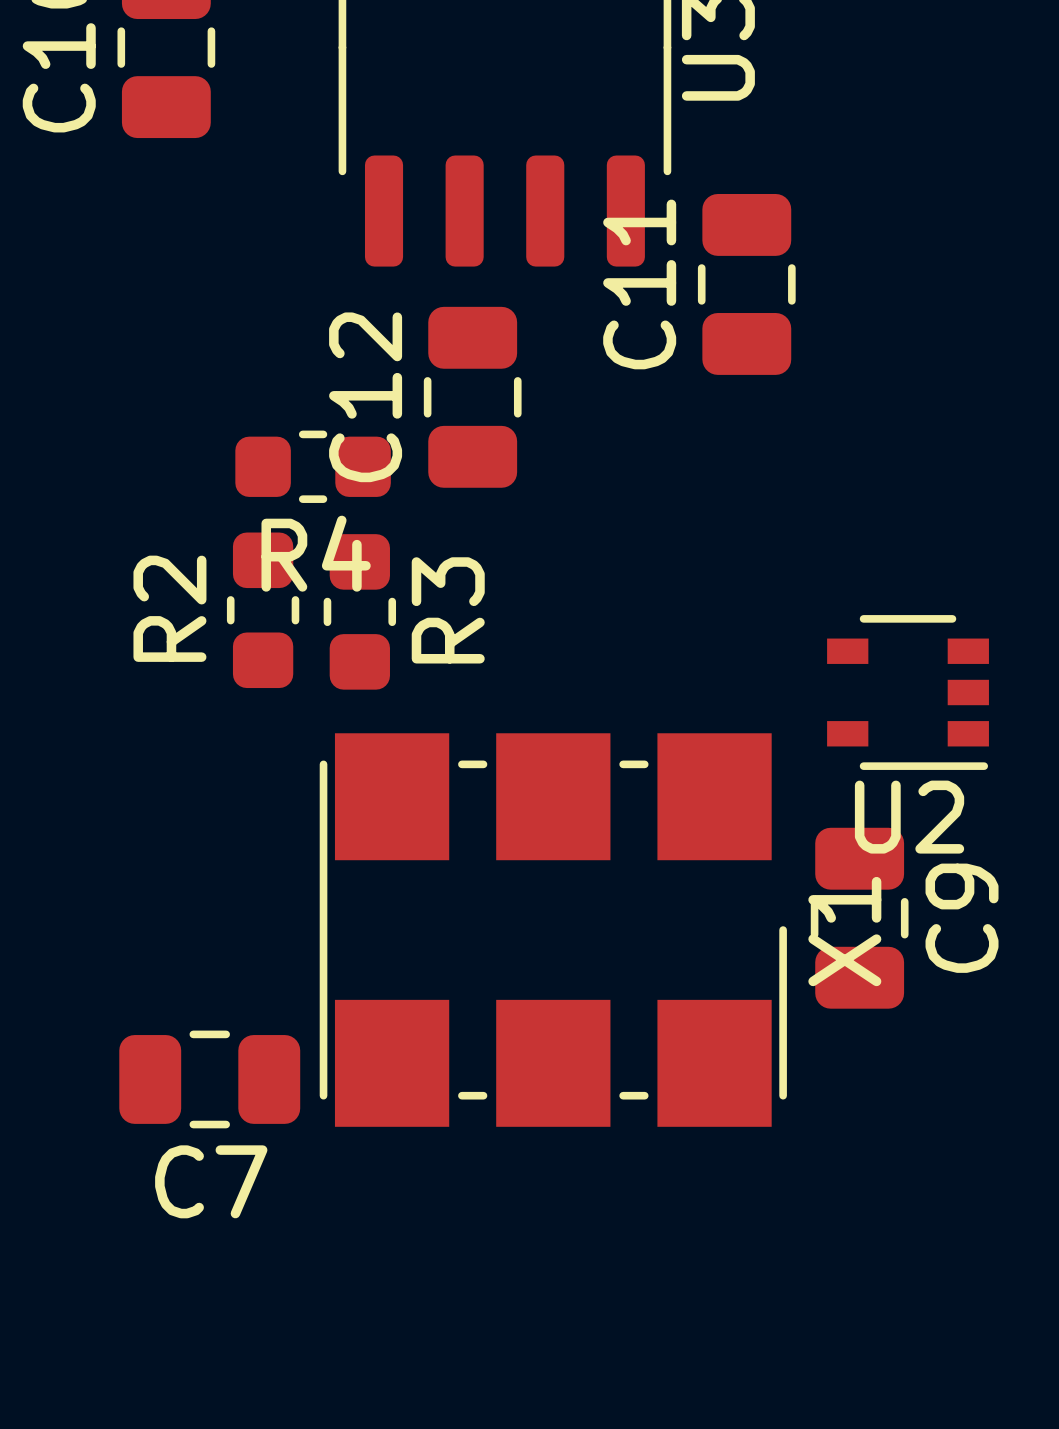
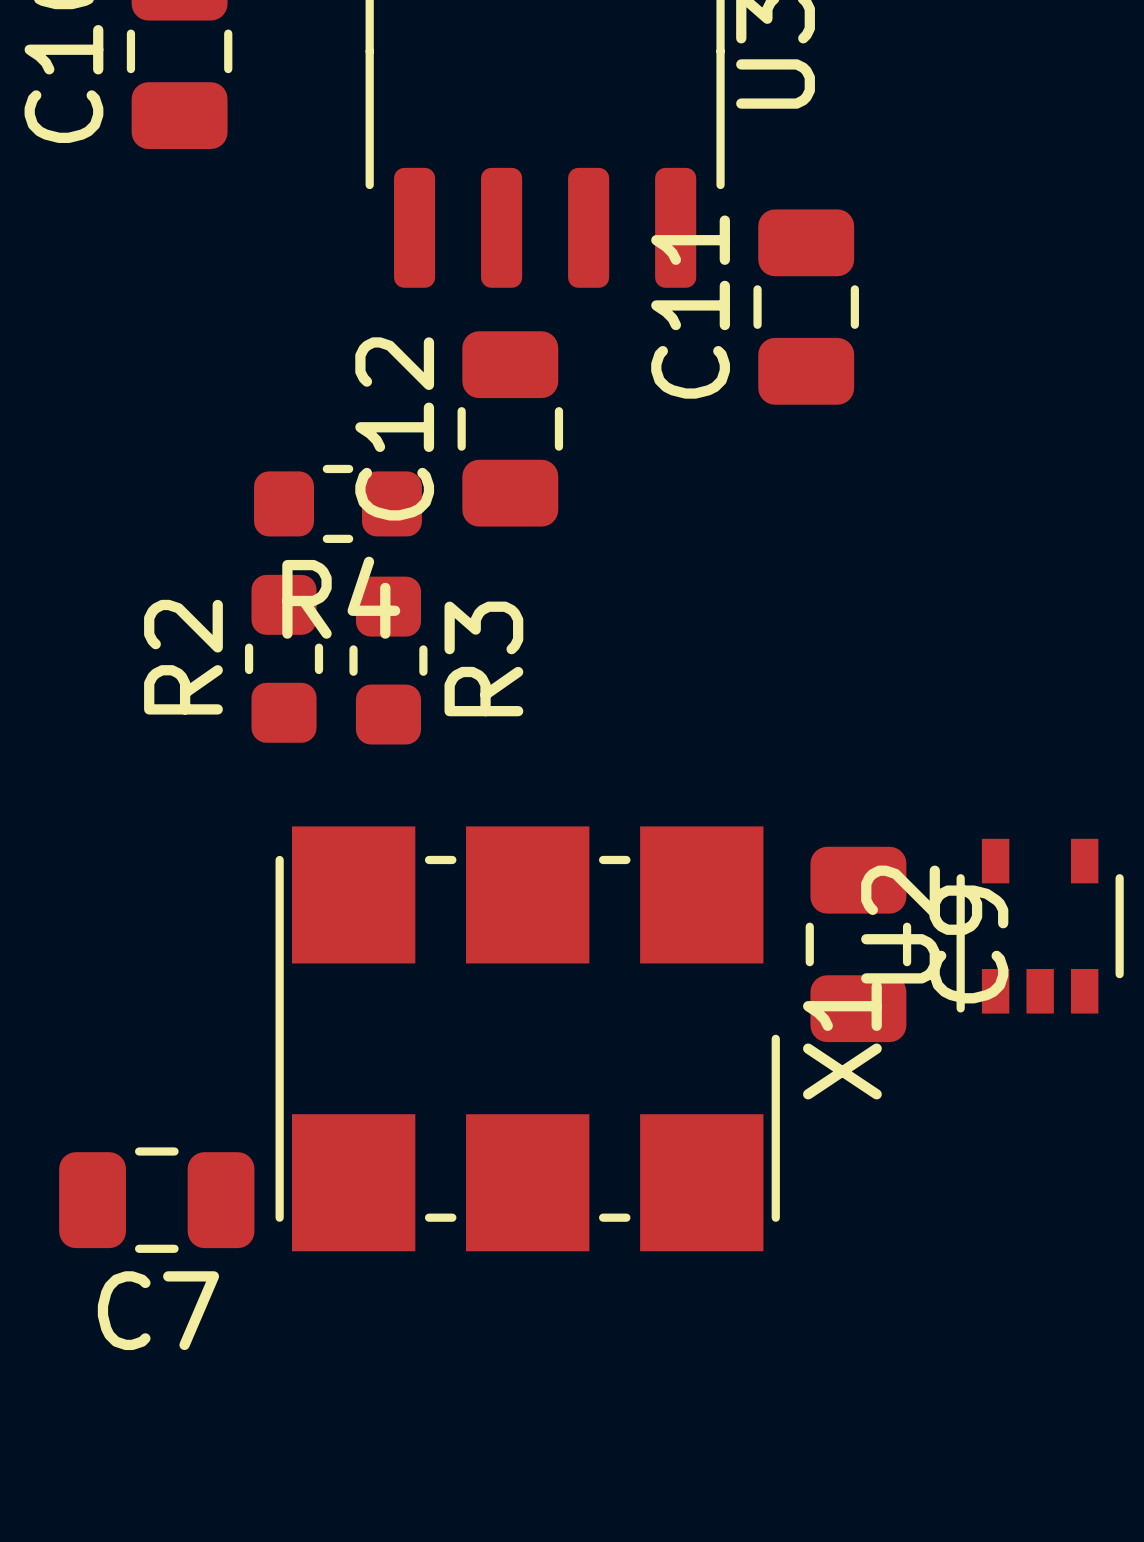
U2 rotation: 0° (908, 692) -> 90° clockwise (1040, 926)
U2 position: (908, 692) -> (1040, 926)
C9 position: (859, 918) -> (858, 944)
X1 position: (553, 930) -> (527, 1038)
C7 position: (209, 1079) -> (156, 1200)

